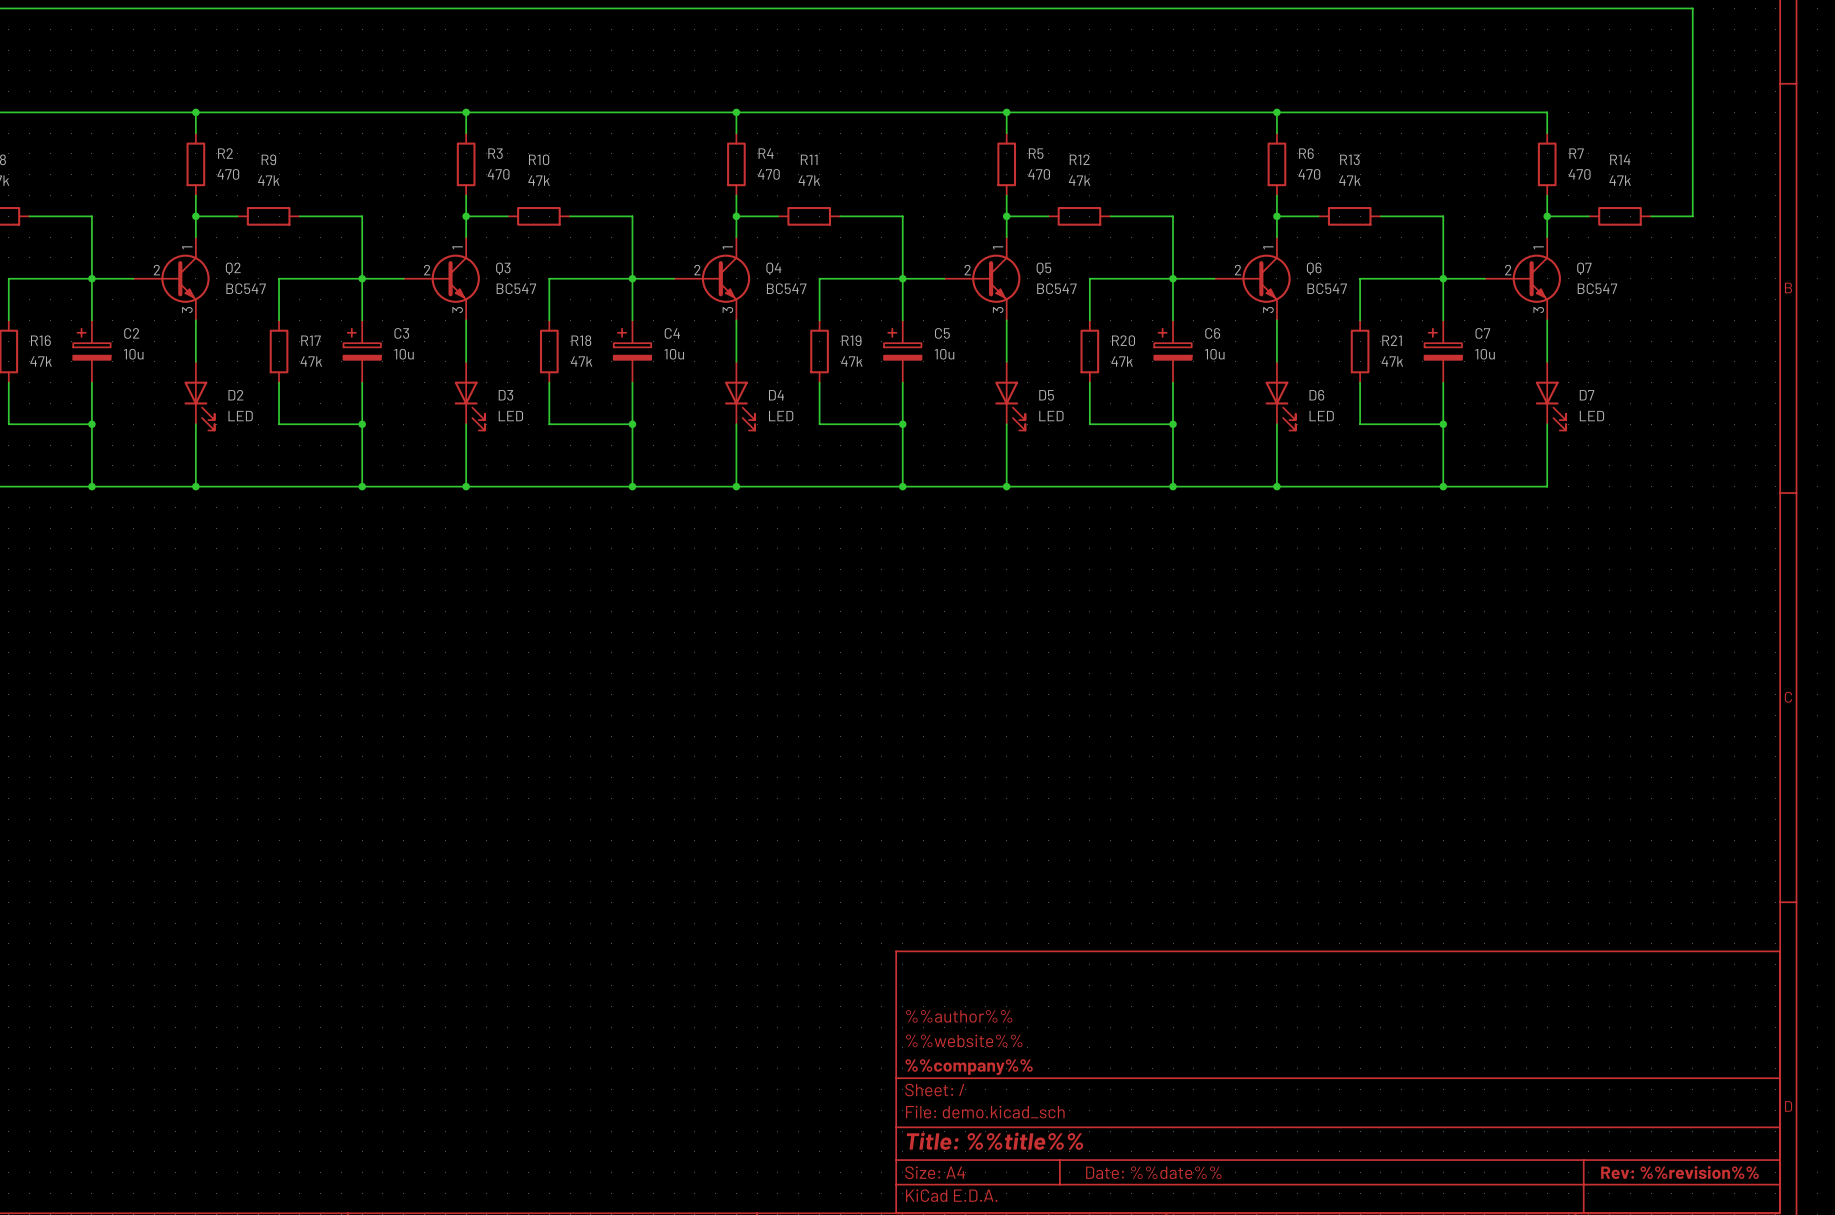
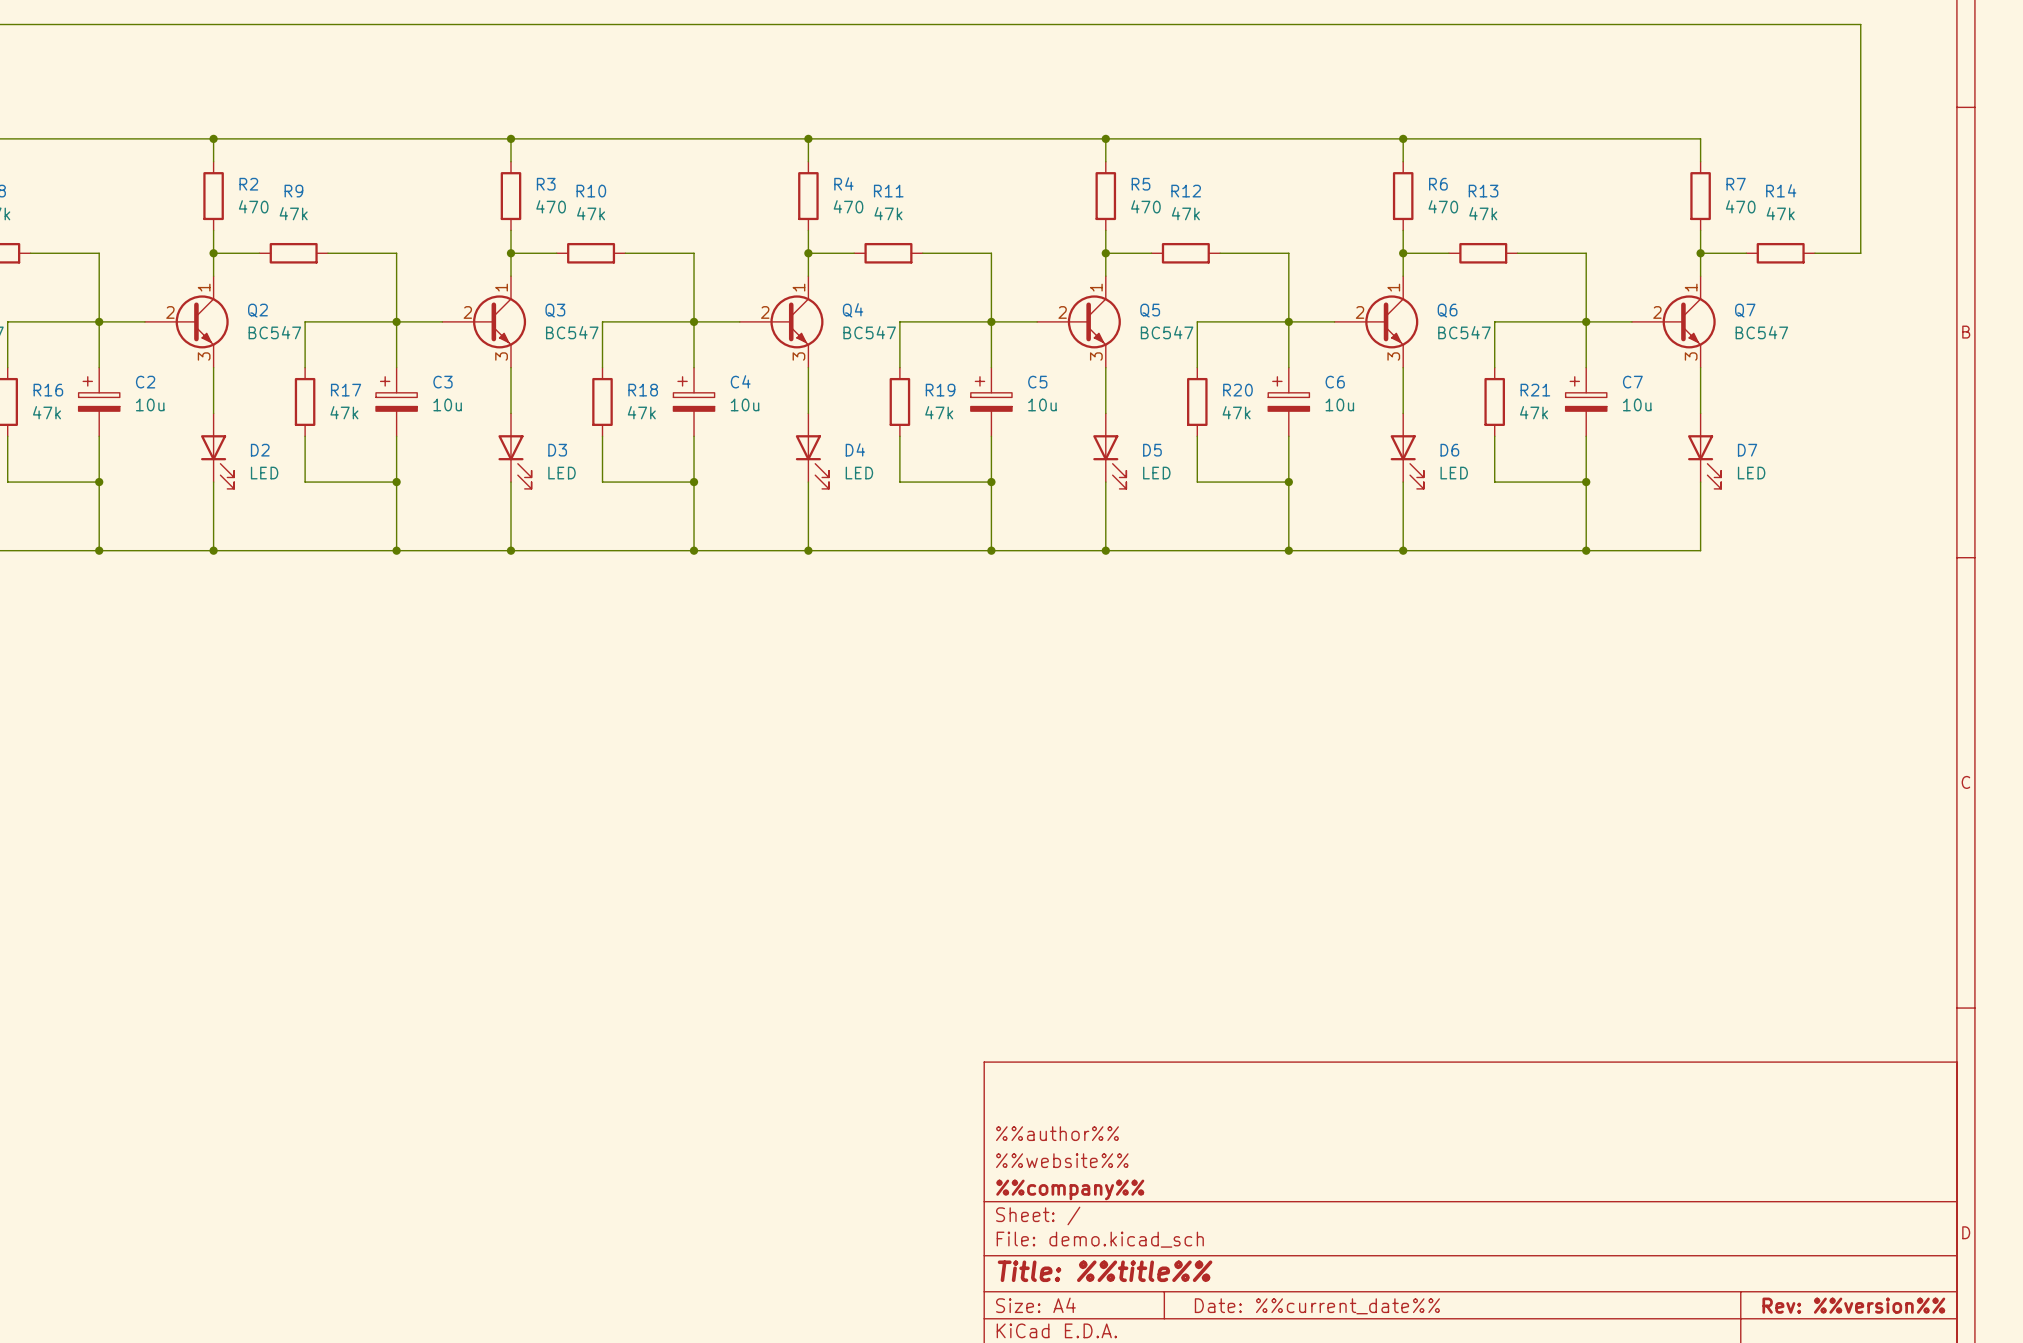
title block: Date: %%date%% (1153, 1172) -> Date: %%current_date%% (1317, 1306)
title block: Rev: %%revision%% (1680, 1172) -> Rev: %%version%% (1853, 1305)

